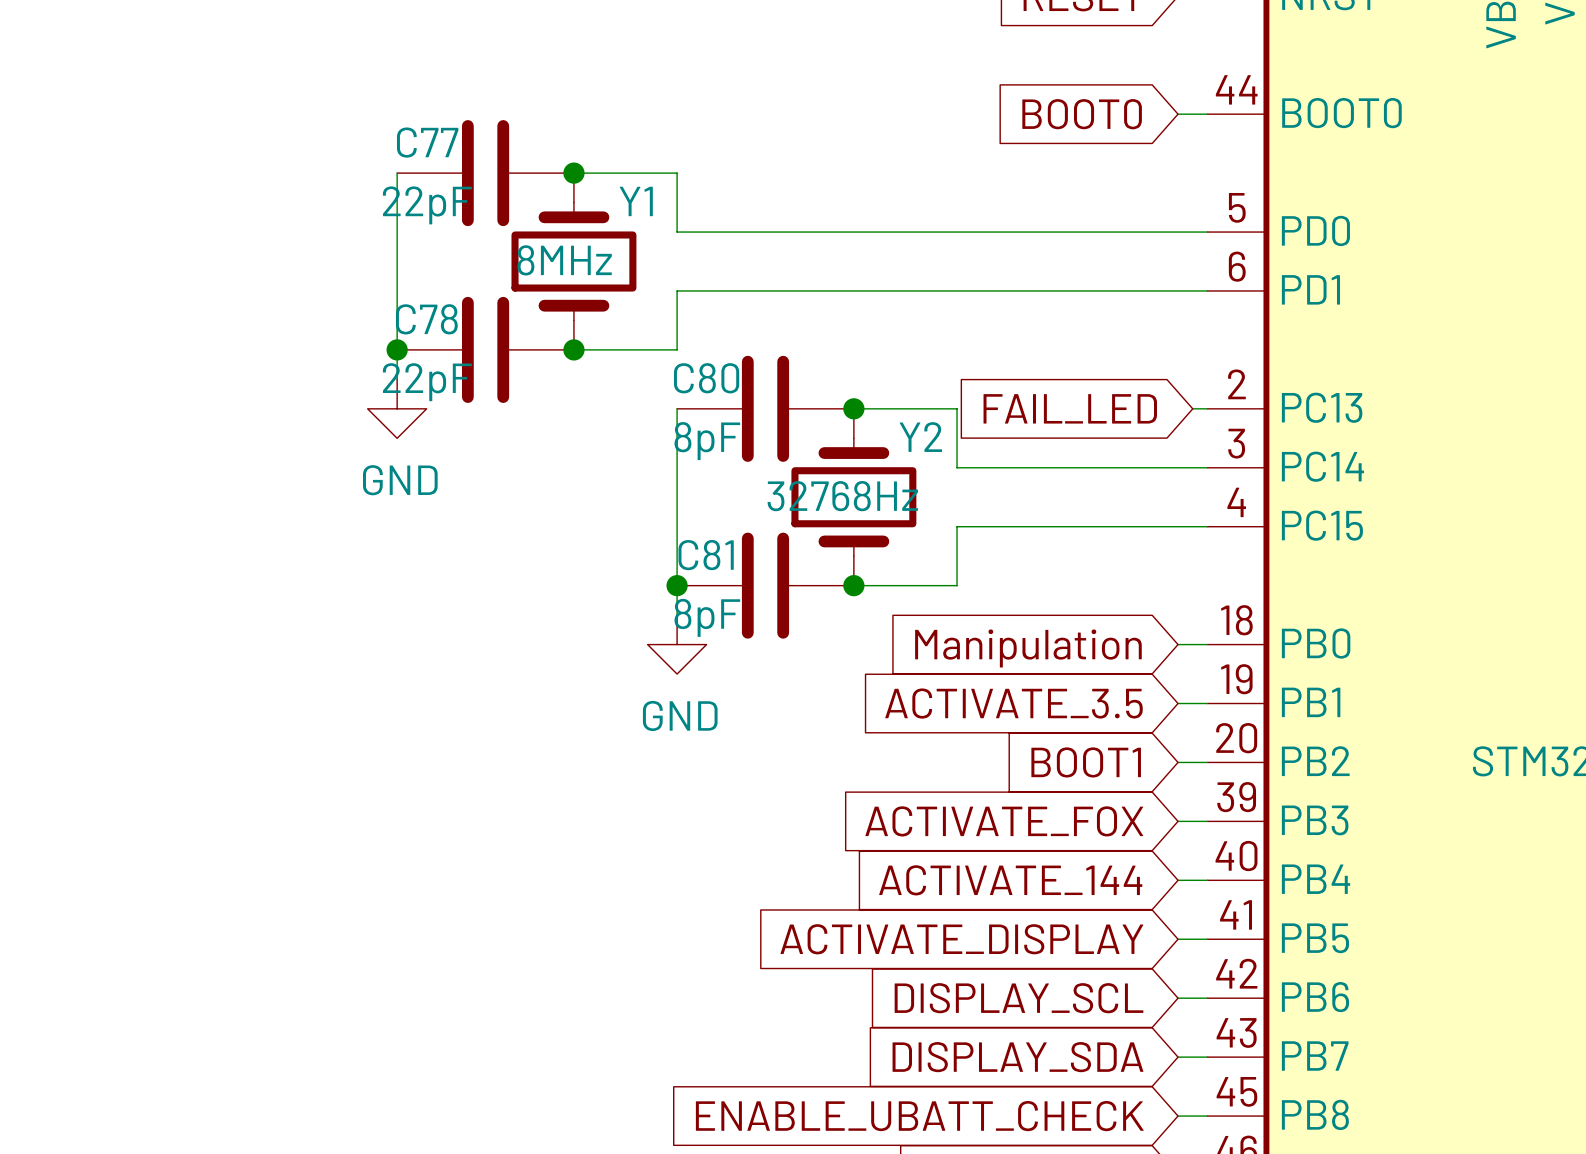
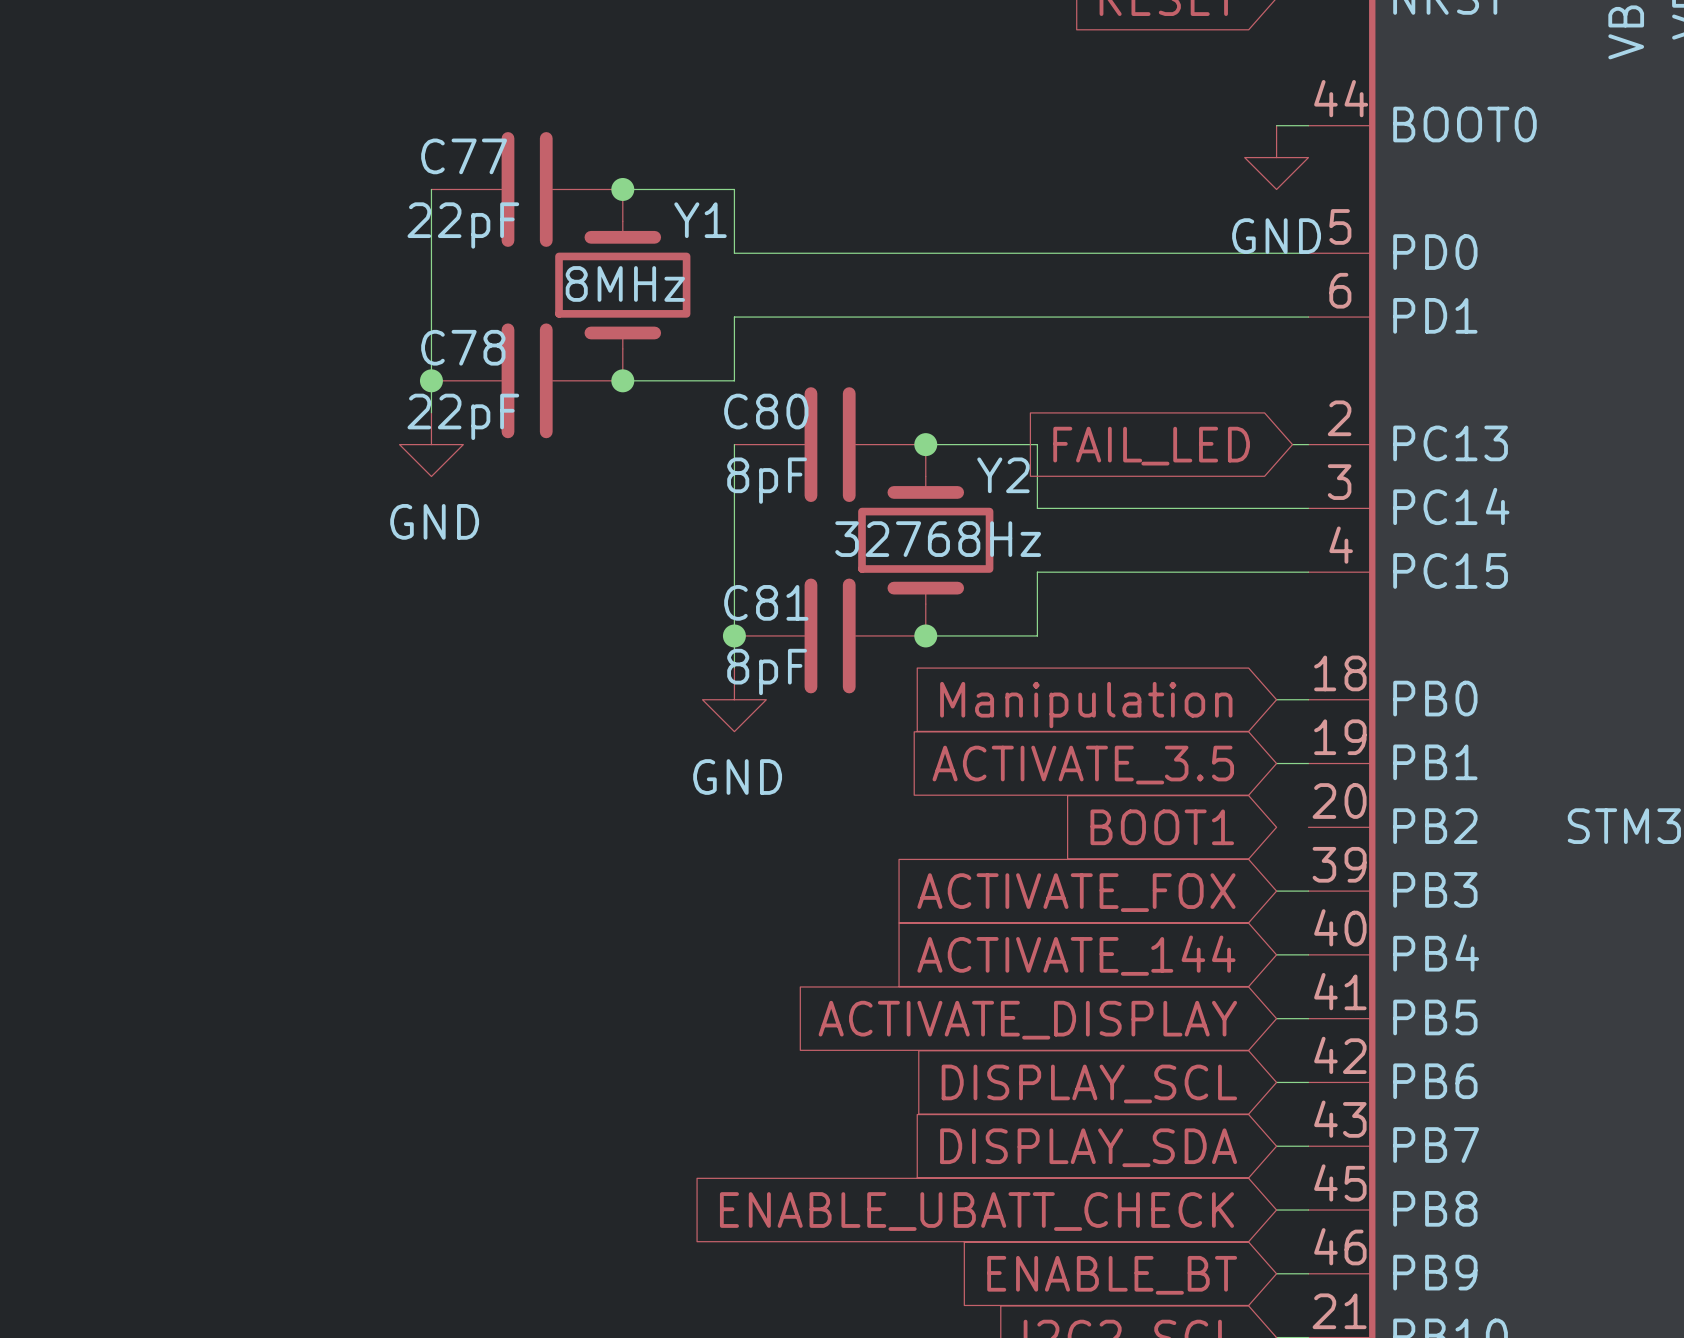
global label: BOOT0 (1082, 114) -> none
power symbol: none -> GND (1276, 157)
wire: (1178, 762) (1207, 762) -> none

